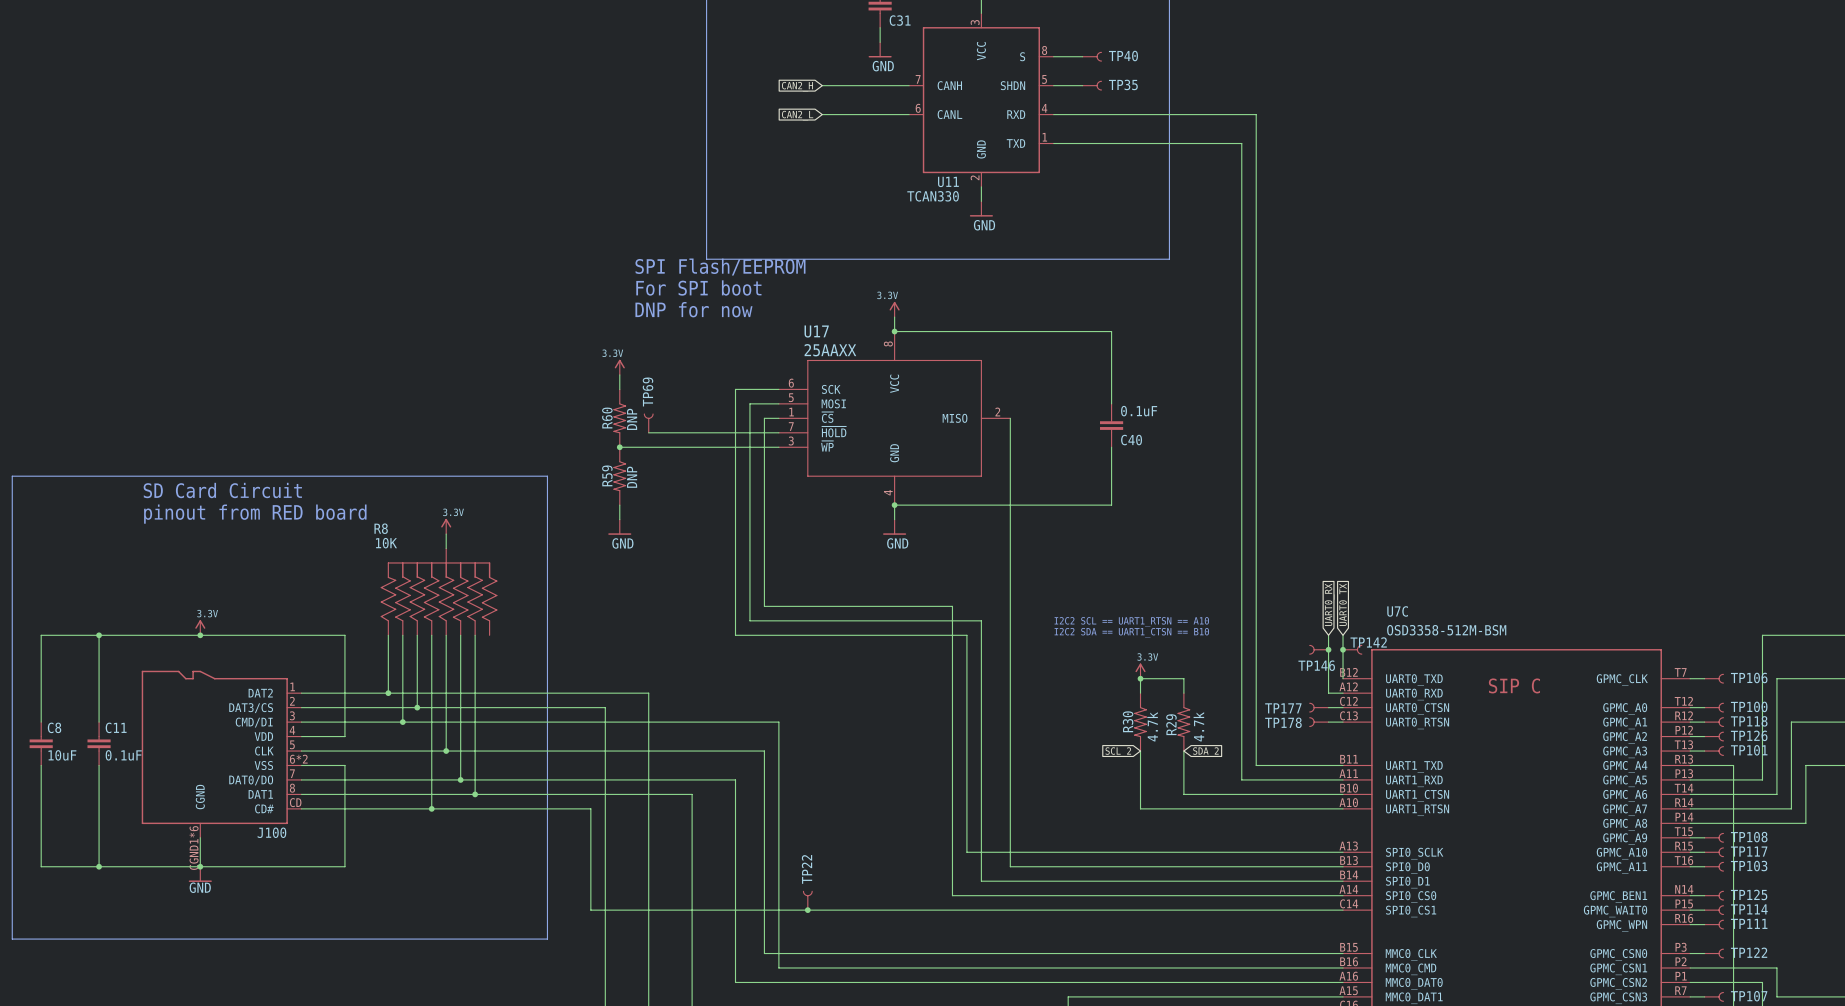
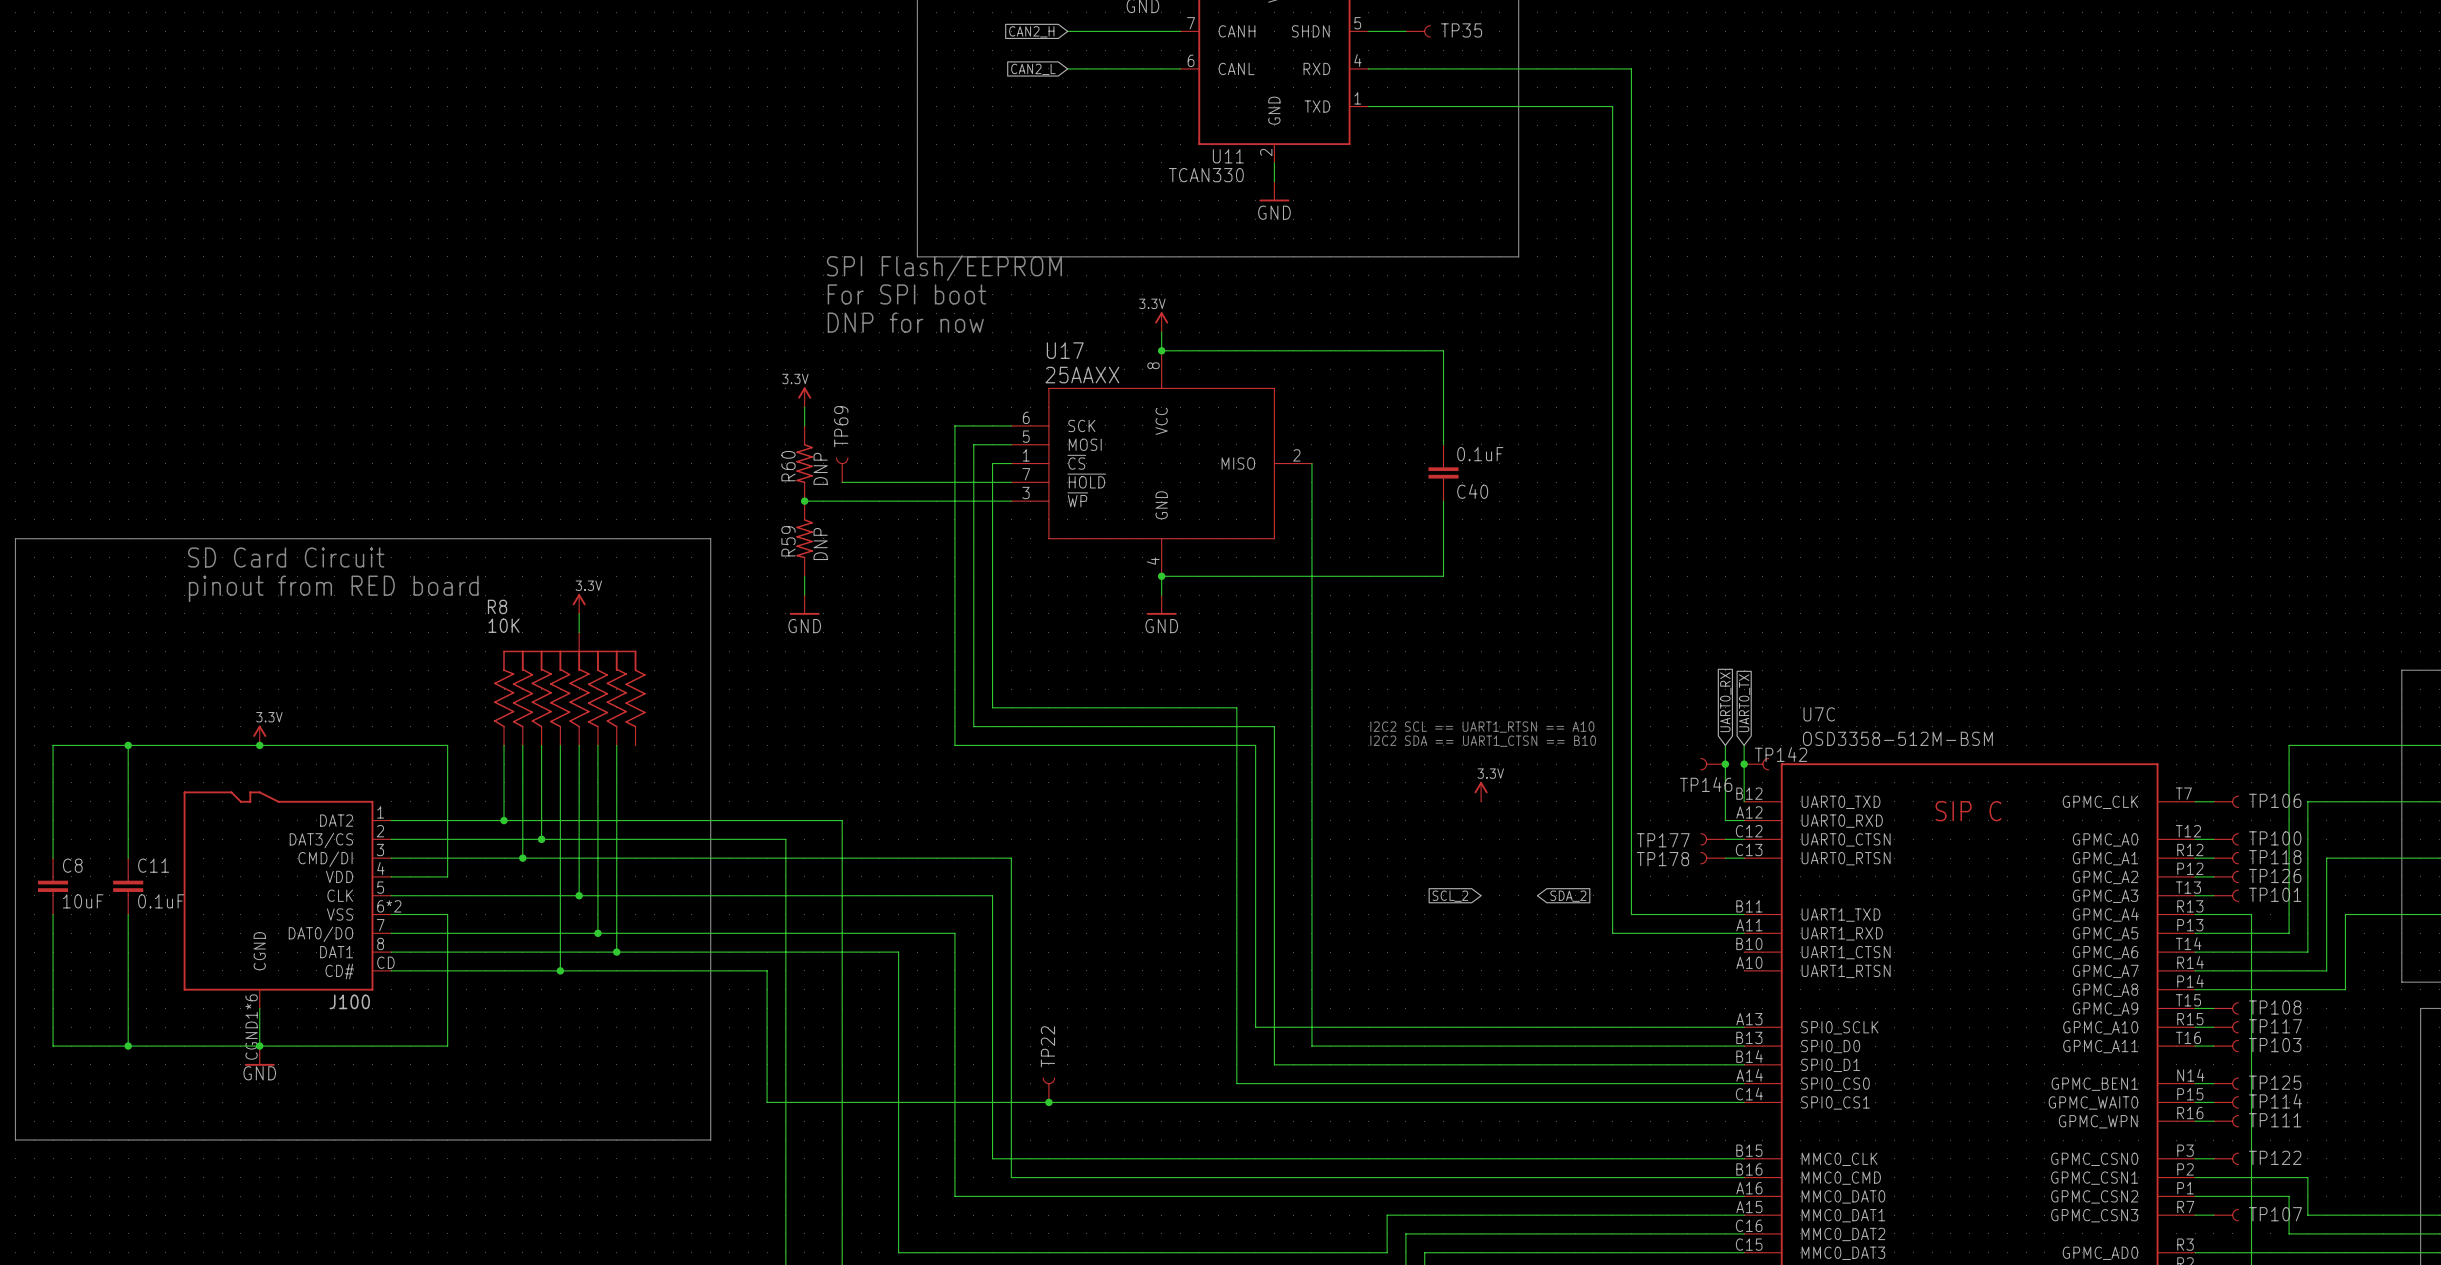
junction: (1140, 678) -> none
wire: (1140, 693) (1140, 678) (1183, 678) (1183, 693) -> none
R30: 4.7k (1140, 722) -> none
R29: 4.7k (1183, 722) -> none
wire: (1140, 751) (1140, 808) (1343, 808) -> none
wire: (1183, 751) (1183, 794) (1343, 794) -> none

